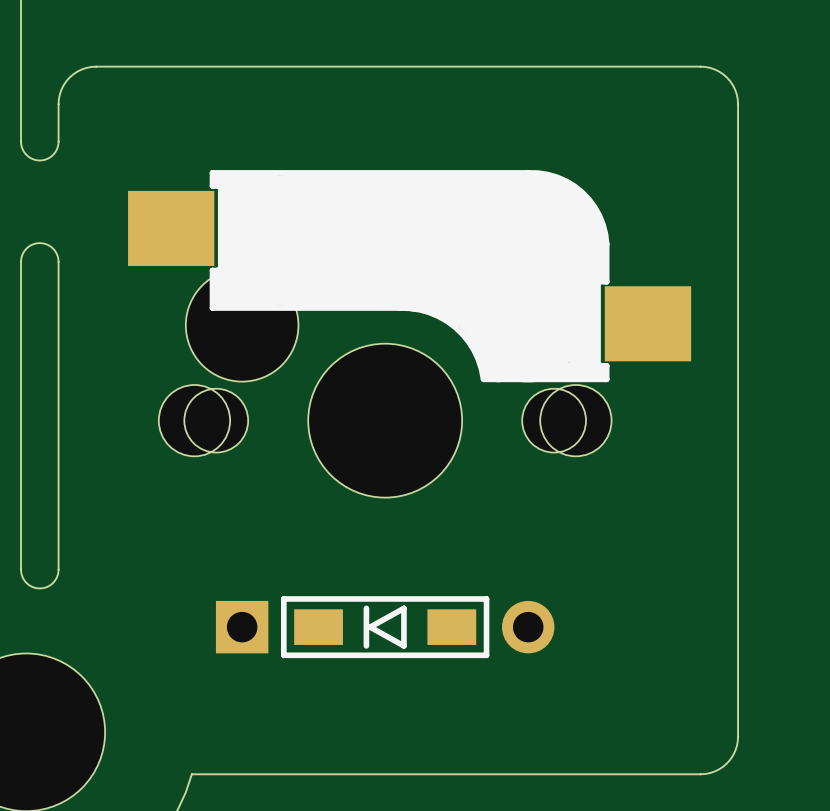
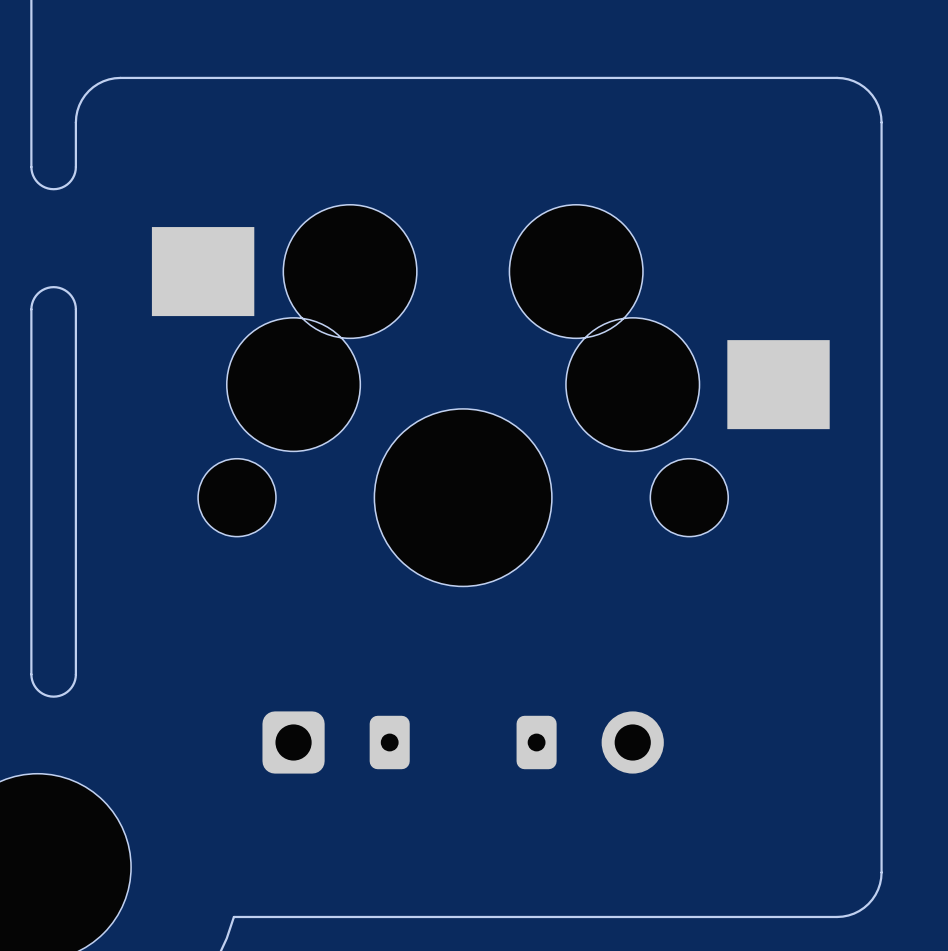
part footprint: [128, 170, 692, 498] -> [151, 204, 830, 587]
part footprint: [215, 596, 555, 659] -> [262, 711, 664, 774]

